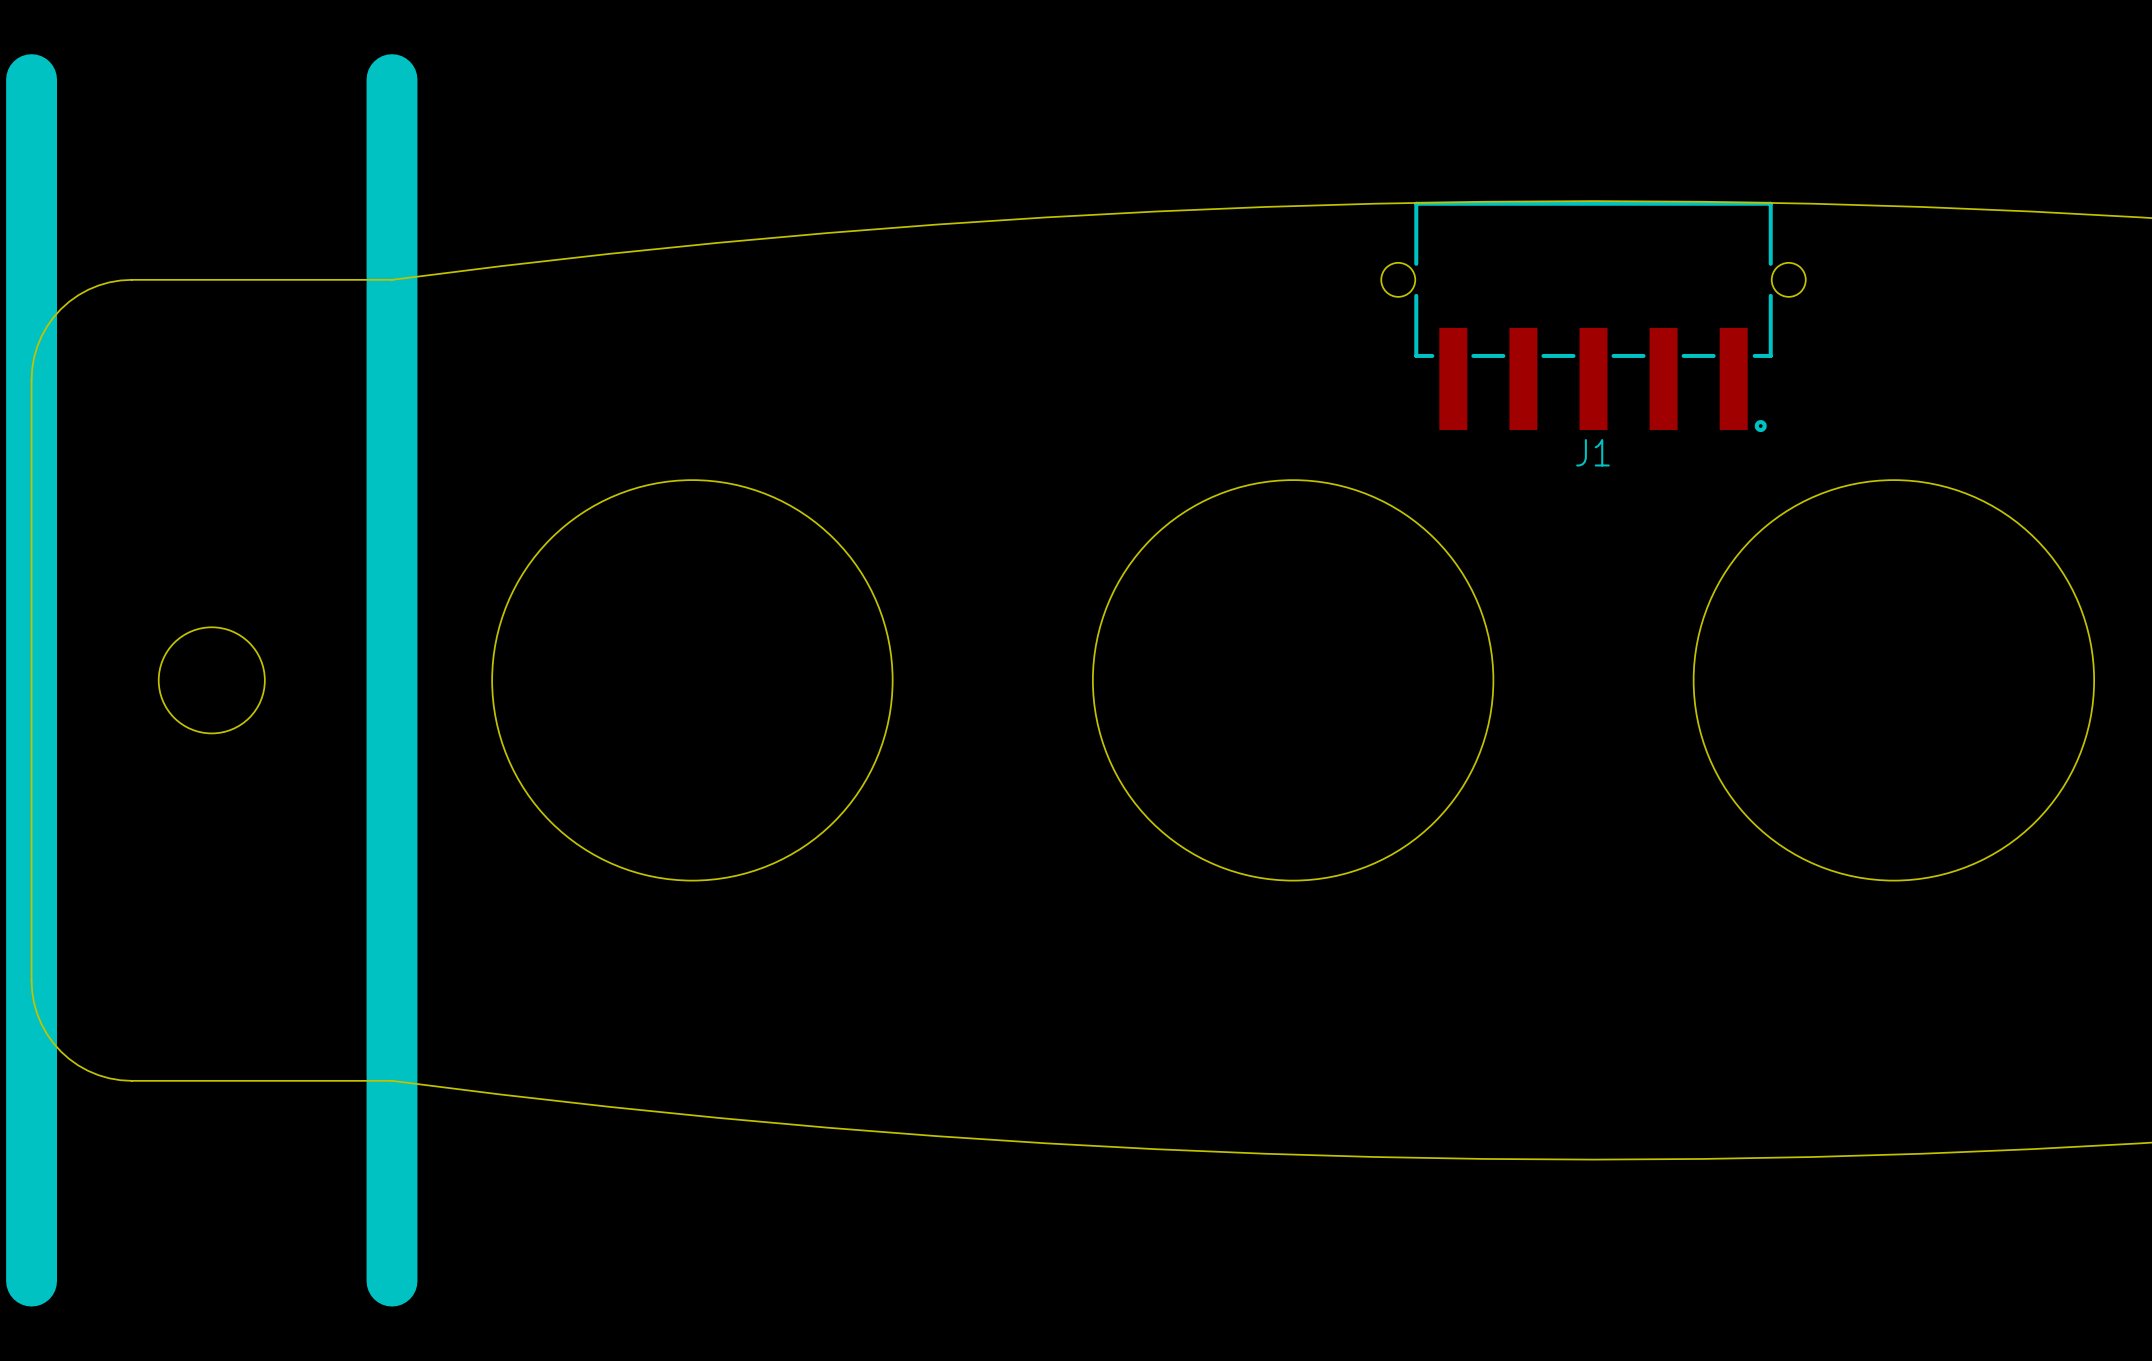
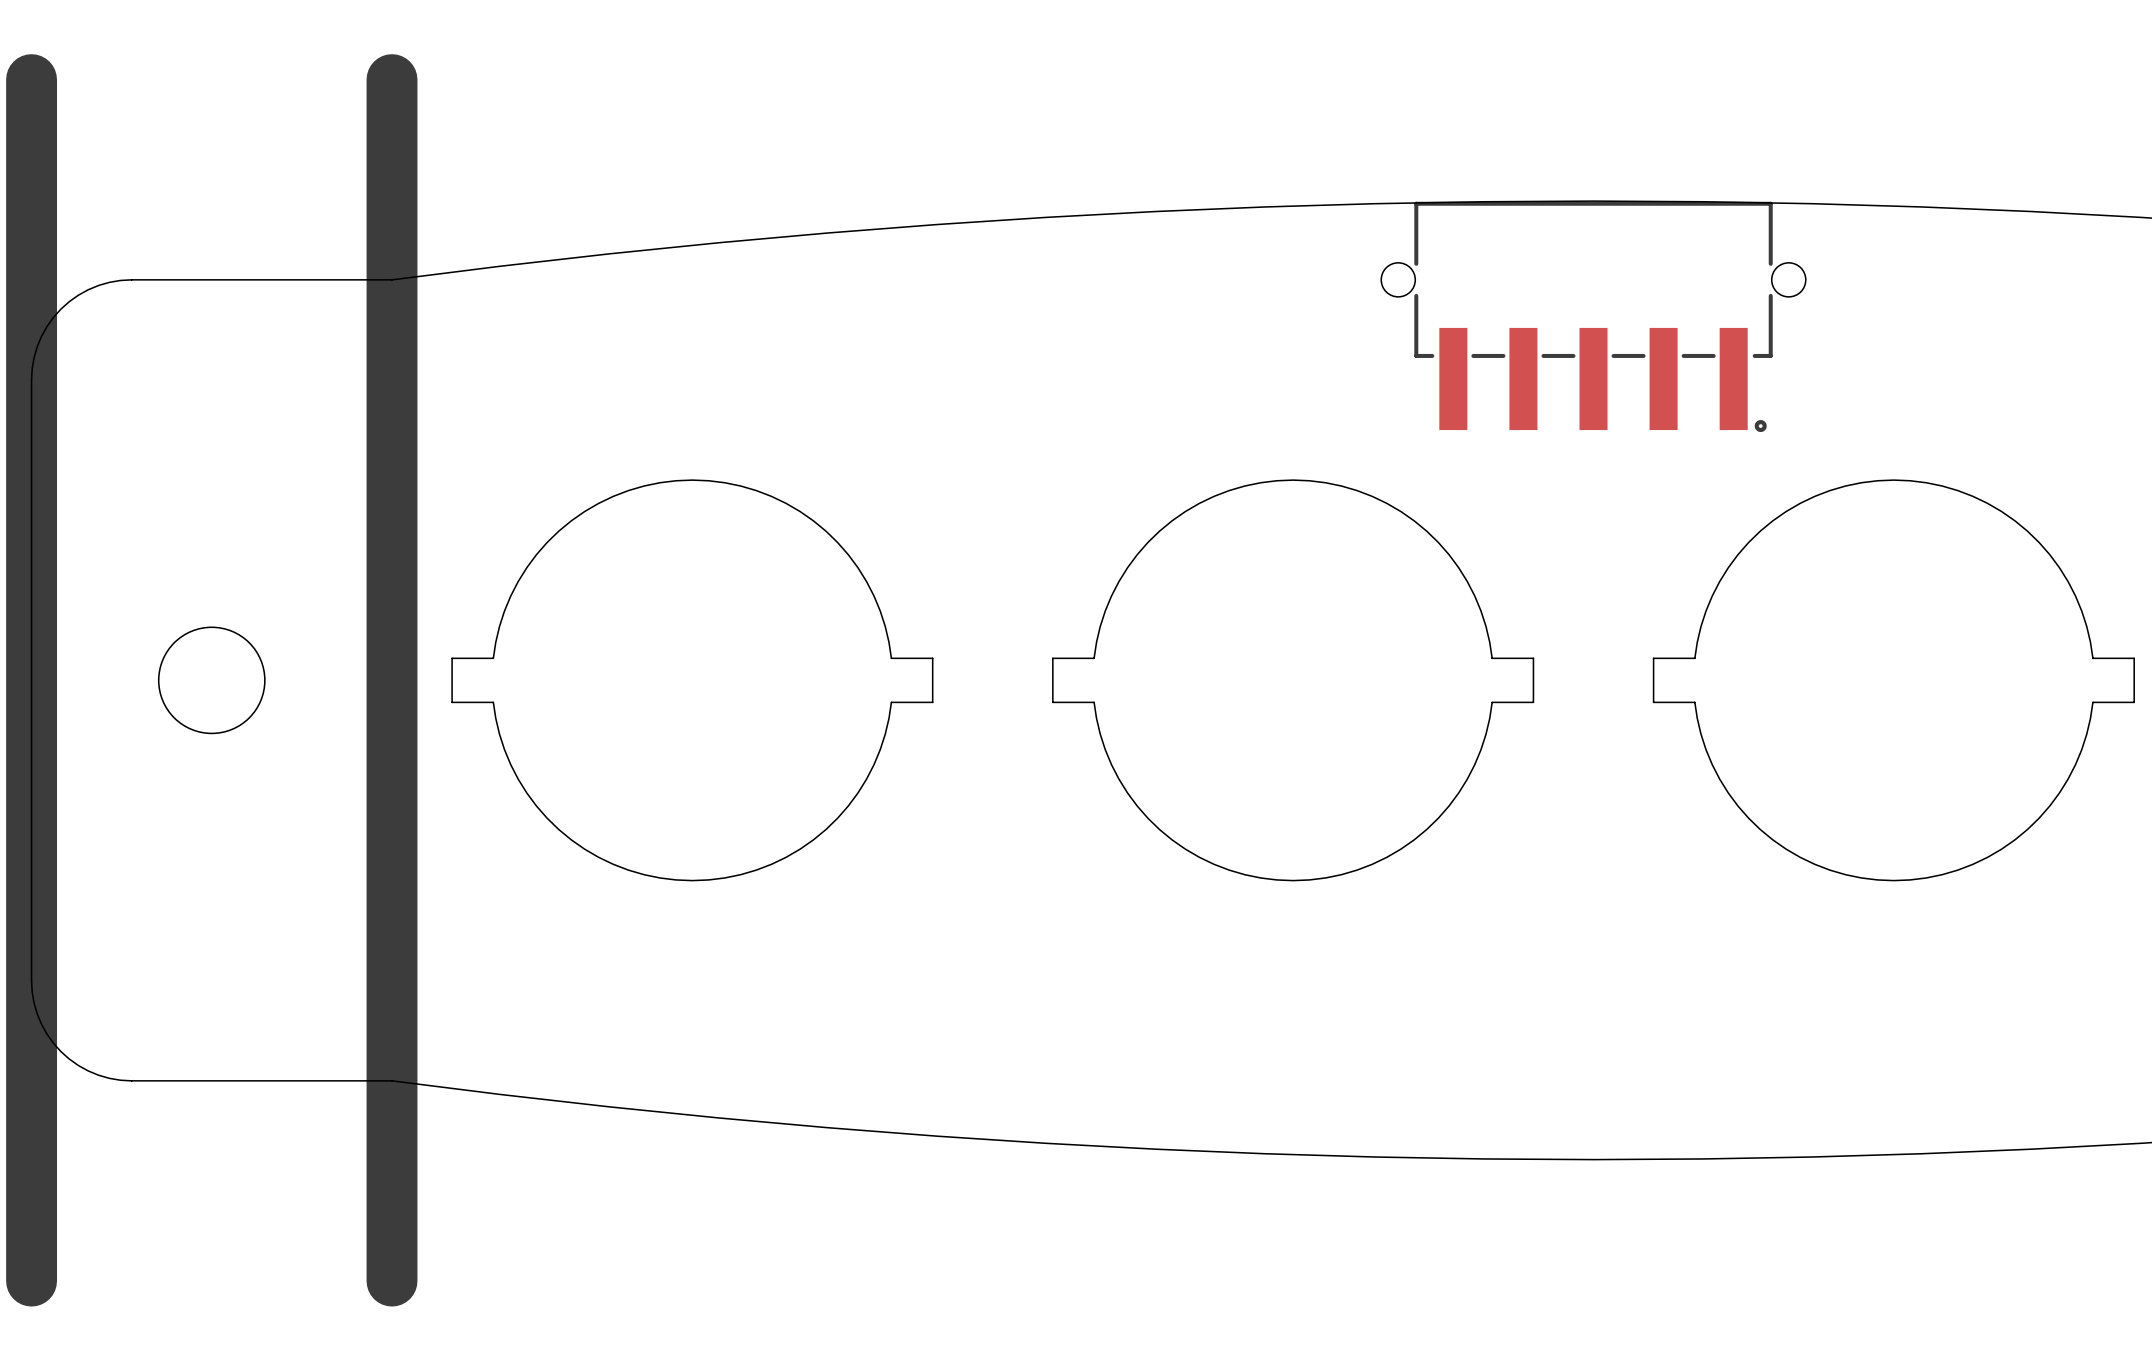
J1 name: J1 (1592, 452) -> none
board edge: none -> (452, 658) (493, 658) (499, 626) (518, 581) (547, 542) (584, 511) (613, 496) (644, 486) (676, 480) (708, 480) (740, 486) (786, 503) (813, 520) (837, 542) (857, 567) (874, 596) (885, 626) (891, 658) (932, 658) (932, 702) (891, 702) (885, 734) (866, 779) (837, 818) (800, 849) (771, 864) (740, 874) (708, 879) (676, 879) (644, 874) (598, 857) (571, 839) (547, 818) (526, 792) (510, 764) (499, 734) (493, 702) (452, 702) (452, 658)
board edge: none -> (1052, 658) (1094, 658) (1100, 626) (1118, 581) (1147, 542) (1185, 511) (1214, 496) (1244, 486) (1276, 480) (1309, 480) (1341, 486) (1386, 503) (1414, 520) (1438, 542) (1458, 567) (1474, 596) (1485, 626) (1492, 658) (1533, 658) (1533, 702) (1492, 702) (1485, 734) (1467, 779) (1438, 818) (1400, 849) (1372, 864) (1341, 874) (1309, 879) (1276, 879) (1244, 874) (1199, 857) (1172, 839) (1147, 818) (1127, 792) (1111, 764) (1100, 734) (1094, 702) (1052, 702) (1052, 658)
board edge: none -> (1653, 658) (1694, 658) (1701, 626) (1719, 581) (1748, 542) (1786, 511) (1814, 496) (1845, 486) (1877, 480) (1910, 480) (1942, 486) (1987, 503) (2014, 520) (2039, 542) (2059, 567) (2075, 596) (2086, 626) (2092, 658) (2134, 658) (2134, 702) (2092, 702) (2086, 734) (2068, 779) (2039, 818) (2001, 849) (1972, 864) (1942, 874) (1910, 879) (1877, 879) (1845, 874) (1800, 857) (1772, 839) (1748, 818) (1728, 792) (1712, 764) (1701, 734) (1694, 702) (1653, 702) (1653, 658)

